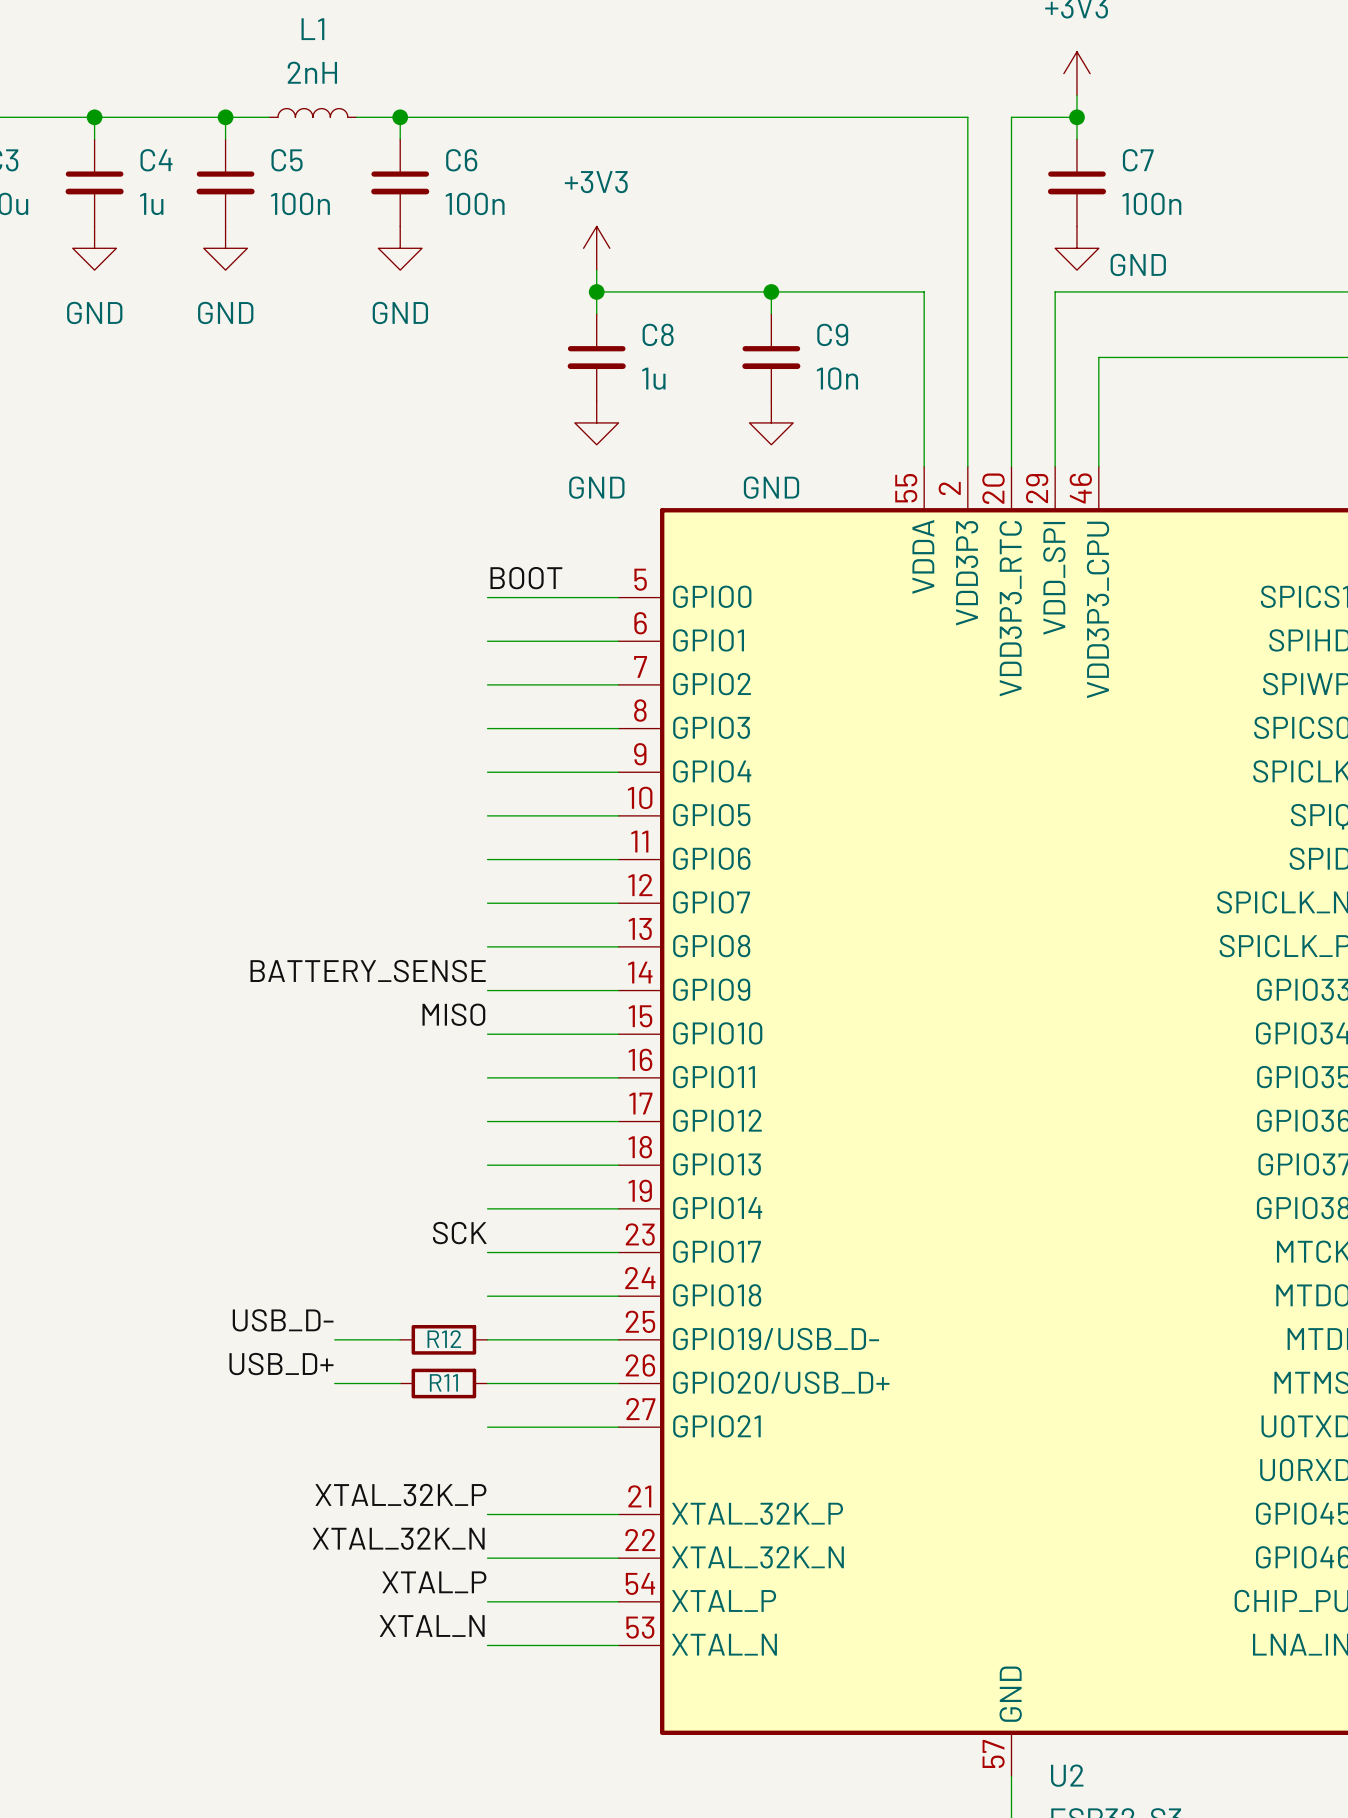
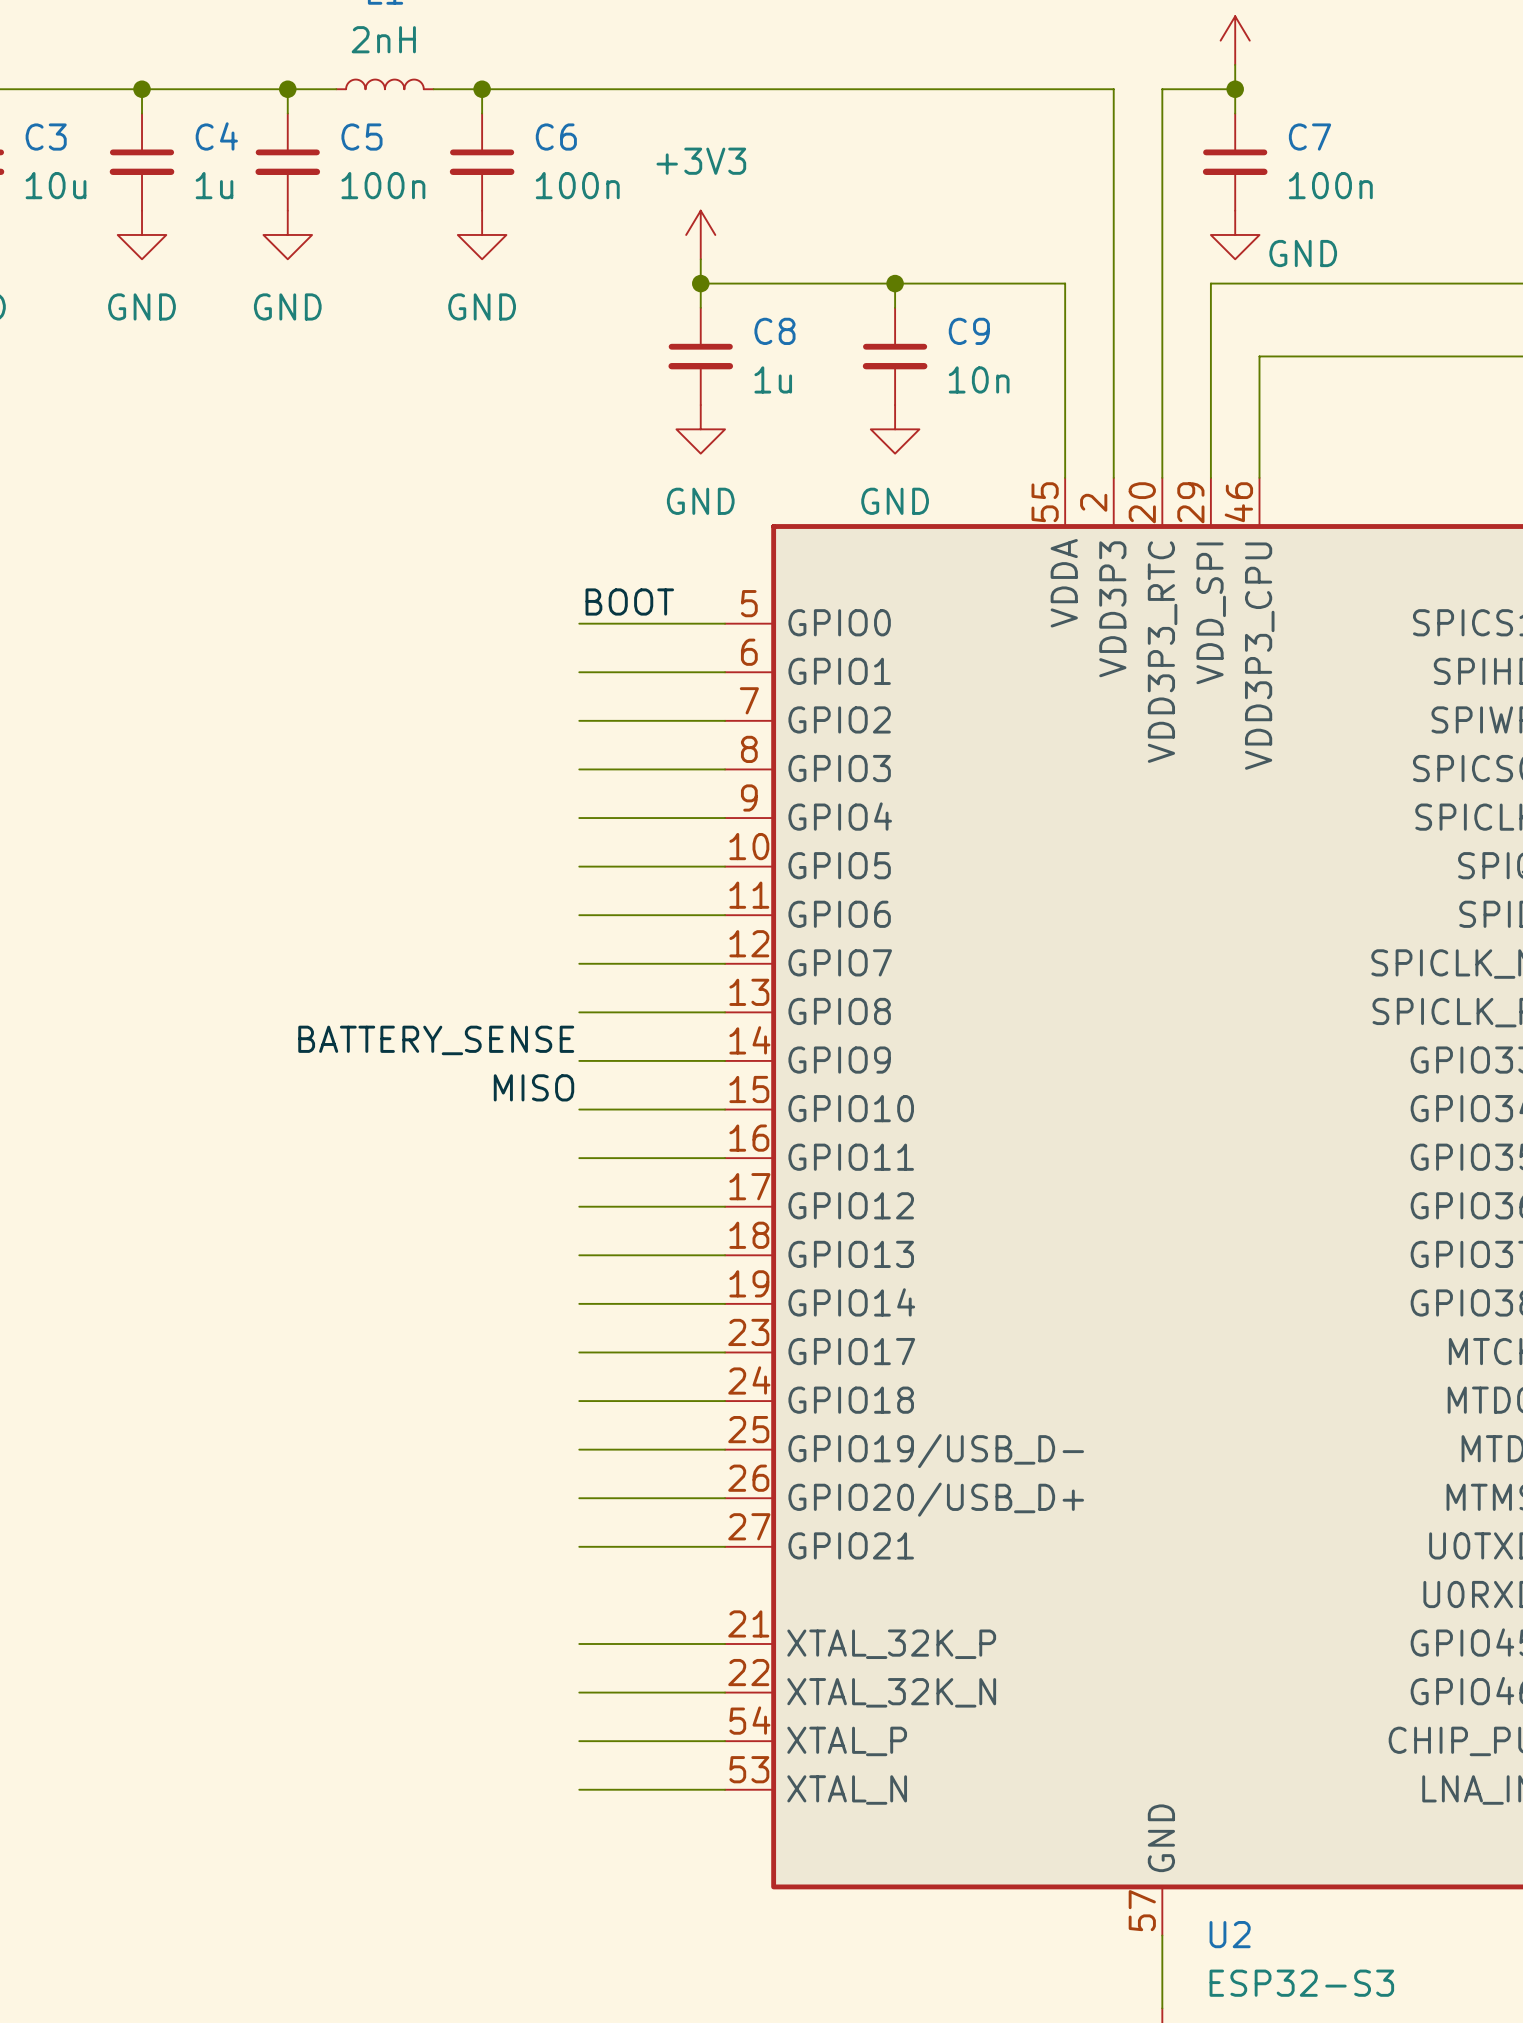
label: SCK (459, 1233) -> none
label: USB_D- (283, 1320) -> none
wire: (334, 1339) (400, 1339) -> none
R12: (443, 1339) -> none
label: USB_D+ (281, 1364) -> none
wire: (334, 1383) (400, 1383) -> none
R11: (443, 1383) -> none
label: XTAL_32K_P (400, 1495) -> none
label: XTAL_32K_N (398, 1538) -> none
label: XTAL_P (434, 1582) -> none
label: XTAL_N (432, 1626) -> none

